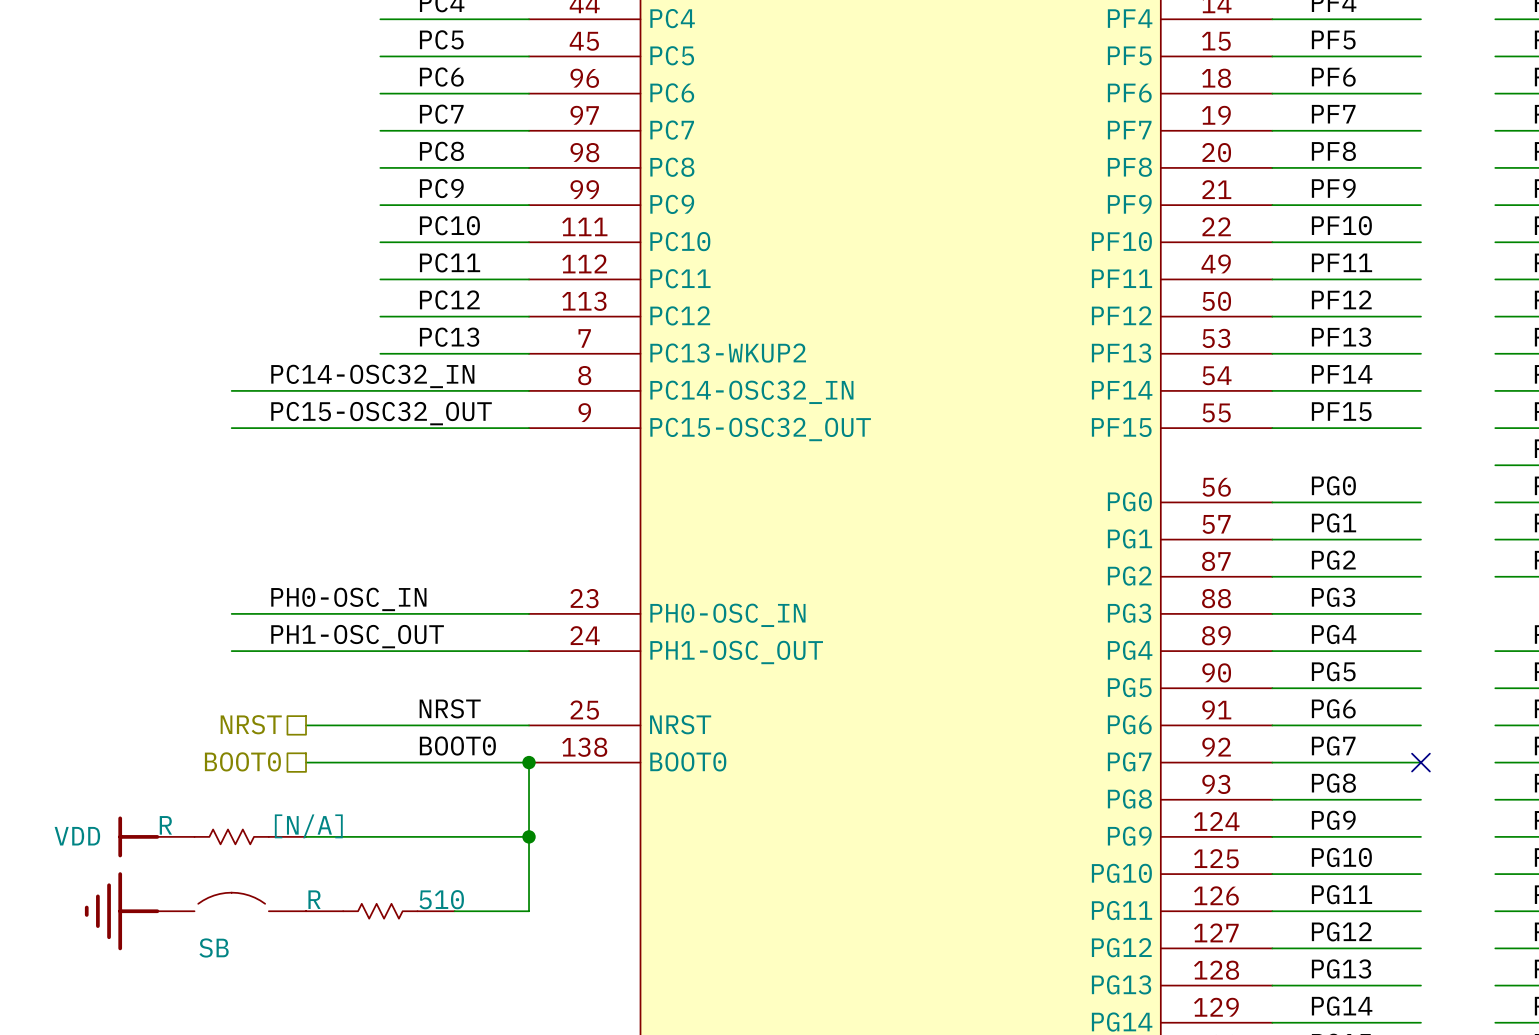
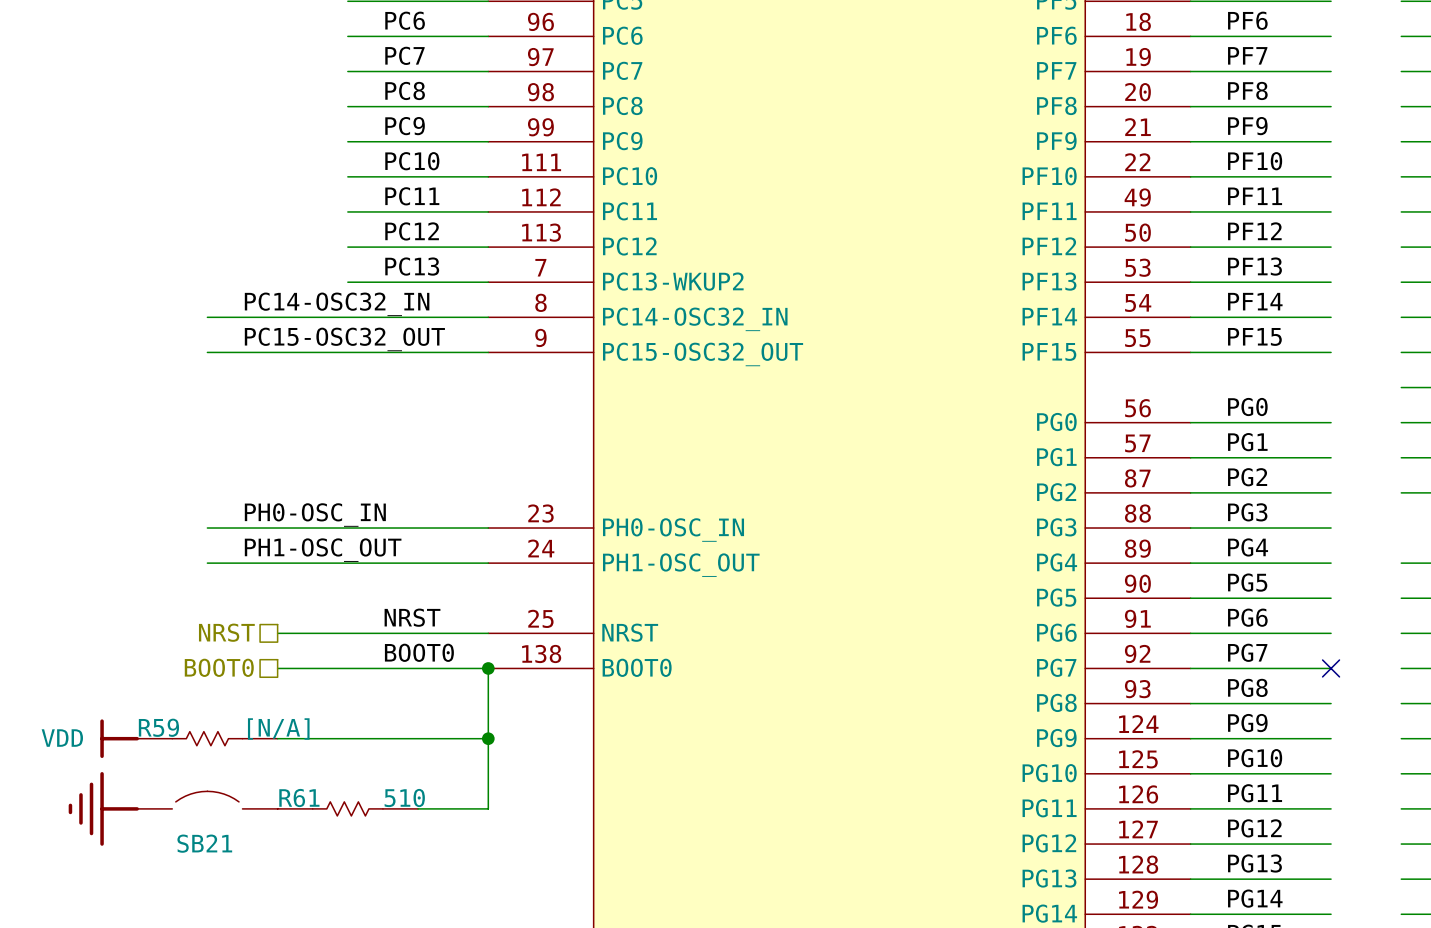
R name: R (165, 825) -> R59 (158, 727)
R name: R (314, 899) -> R61 (299, 798)
SB name: SB (214, 947) -> SB21 (204, 843)

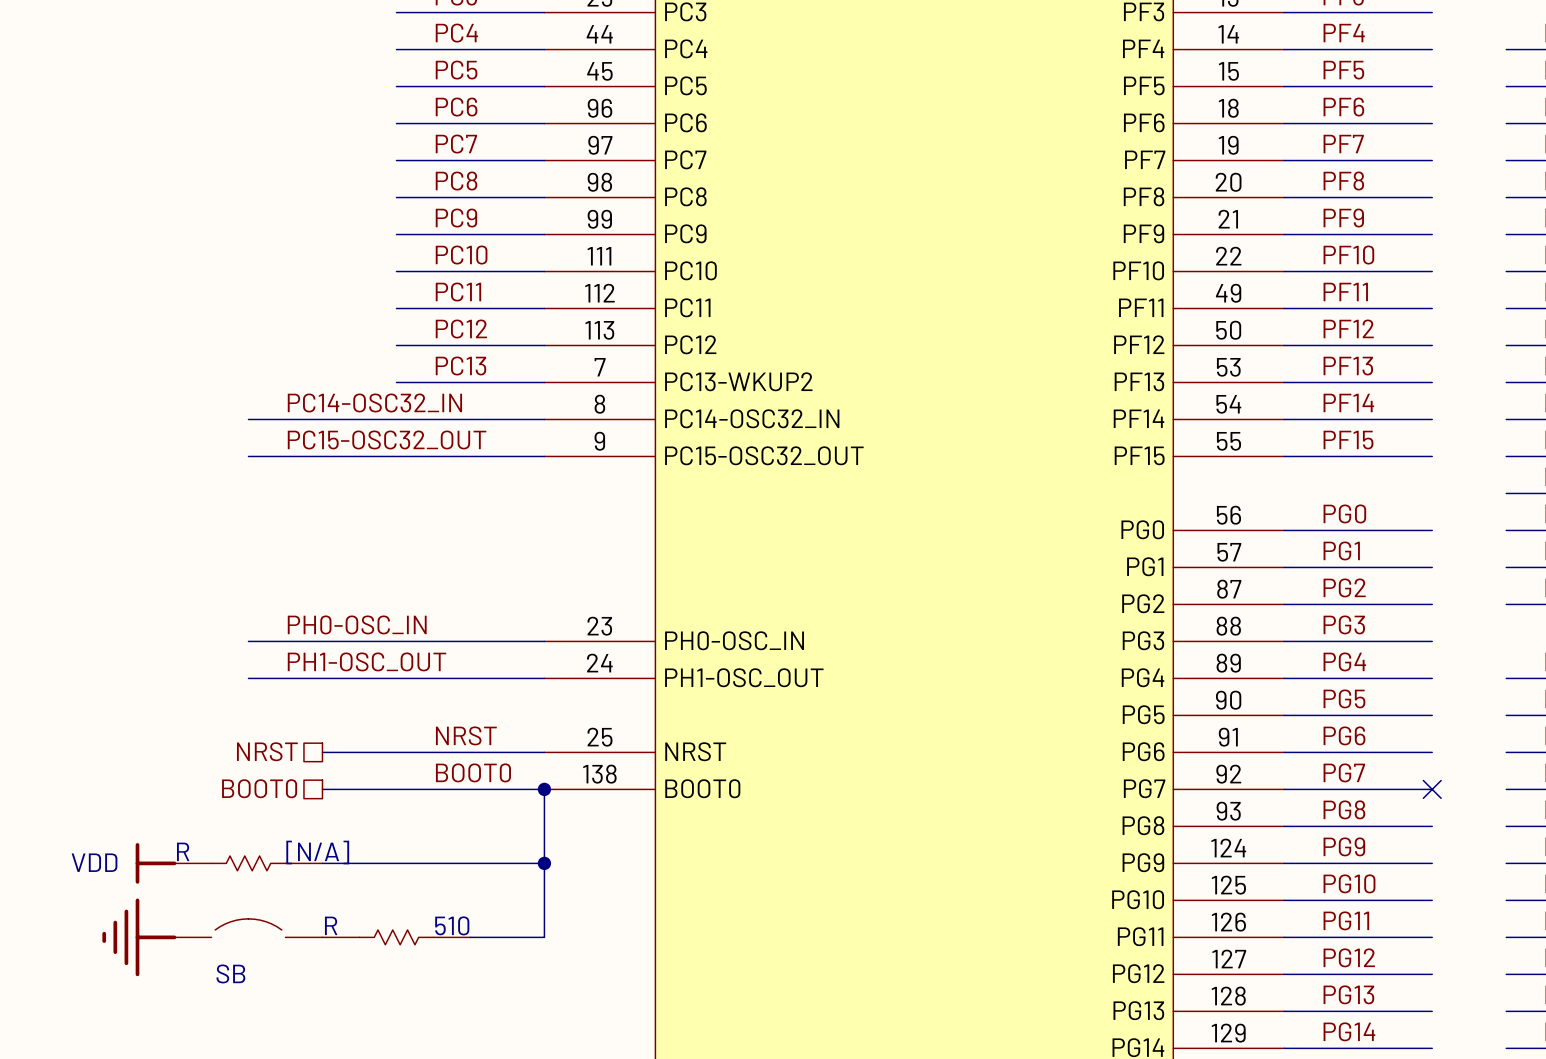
R59 name: R59 (158, 727) -> R (183, 851)
R61 name: R61 (299, 798) -> R (331, 925)
SB21 name: SB21 (204, 843) -> SB (230, 973)

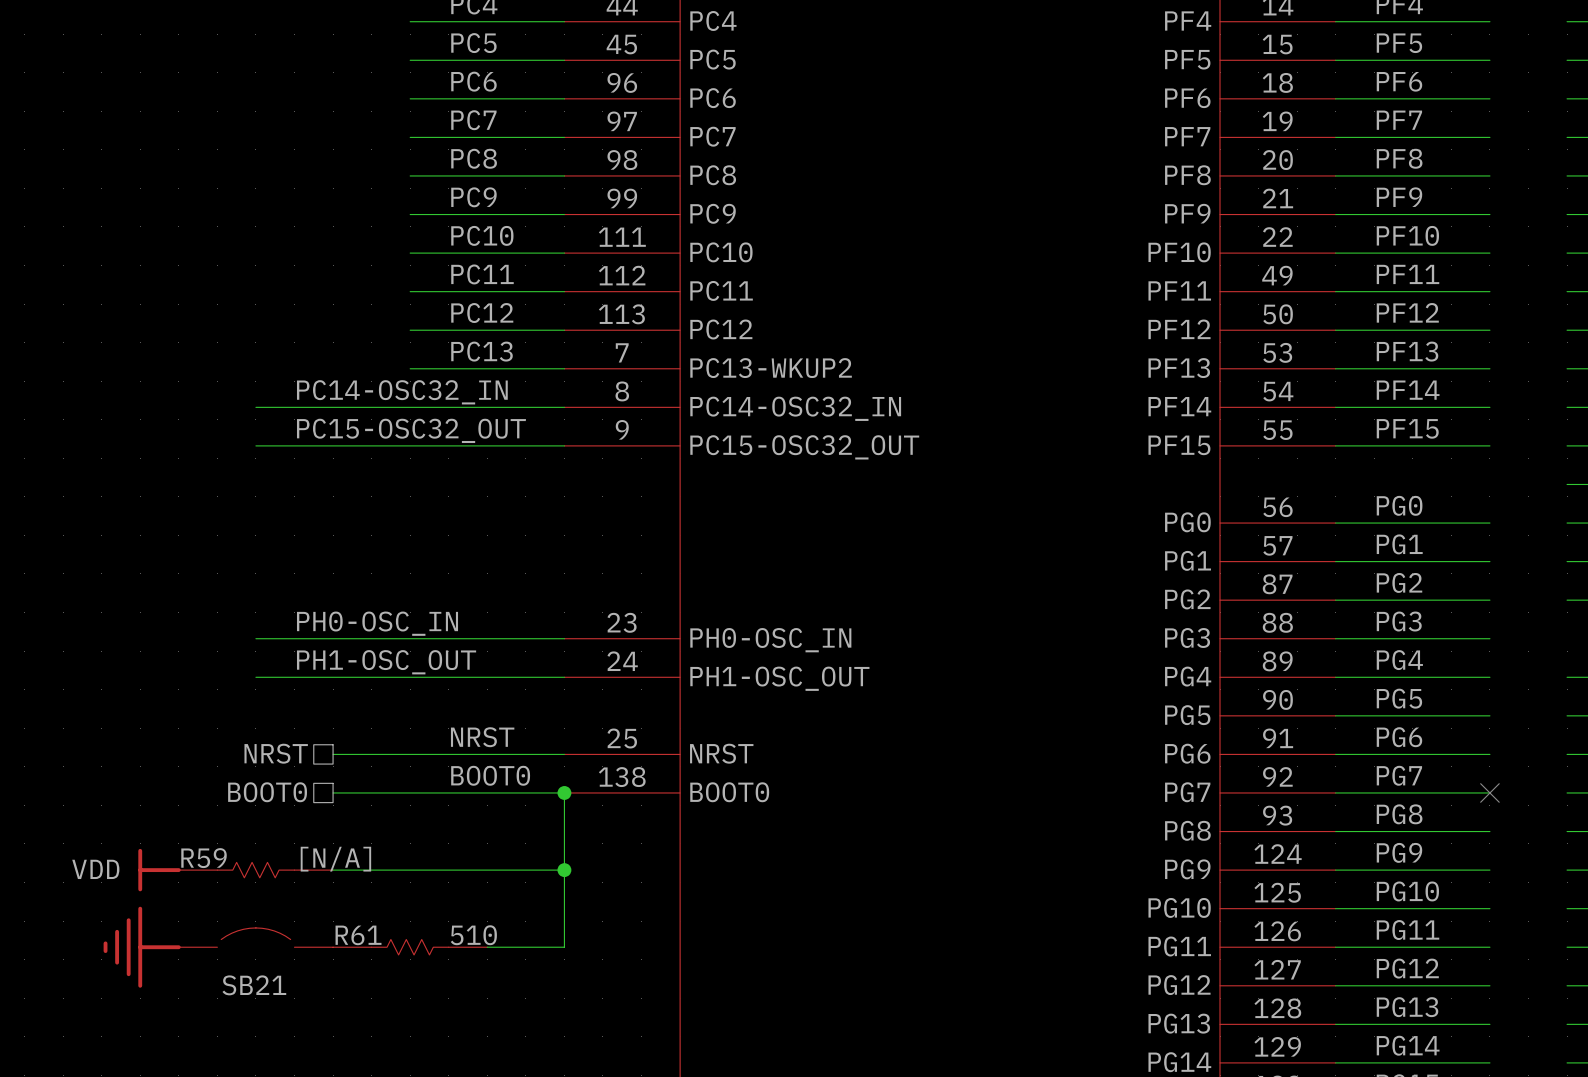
R name: R (183, 851) -> R59 (204, 858)
R name: R (331, 925) -> R61 (358, 935)
SB name: SB (230, 973) -> SB21 (254, 985)

